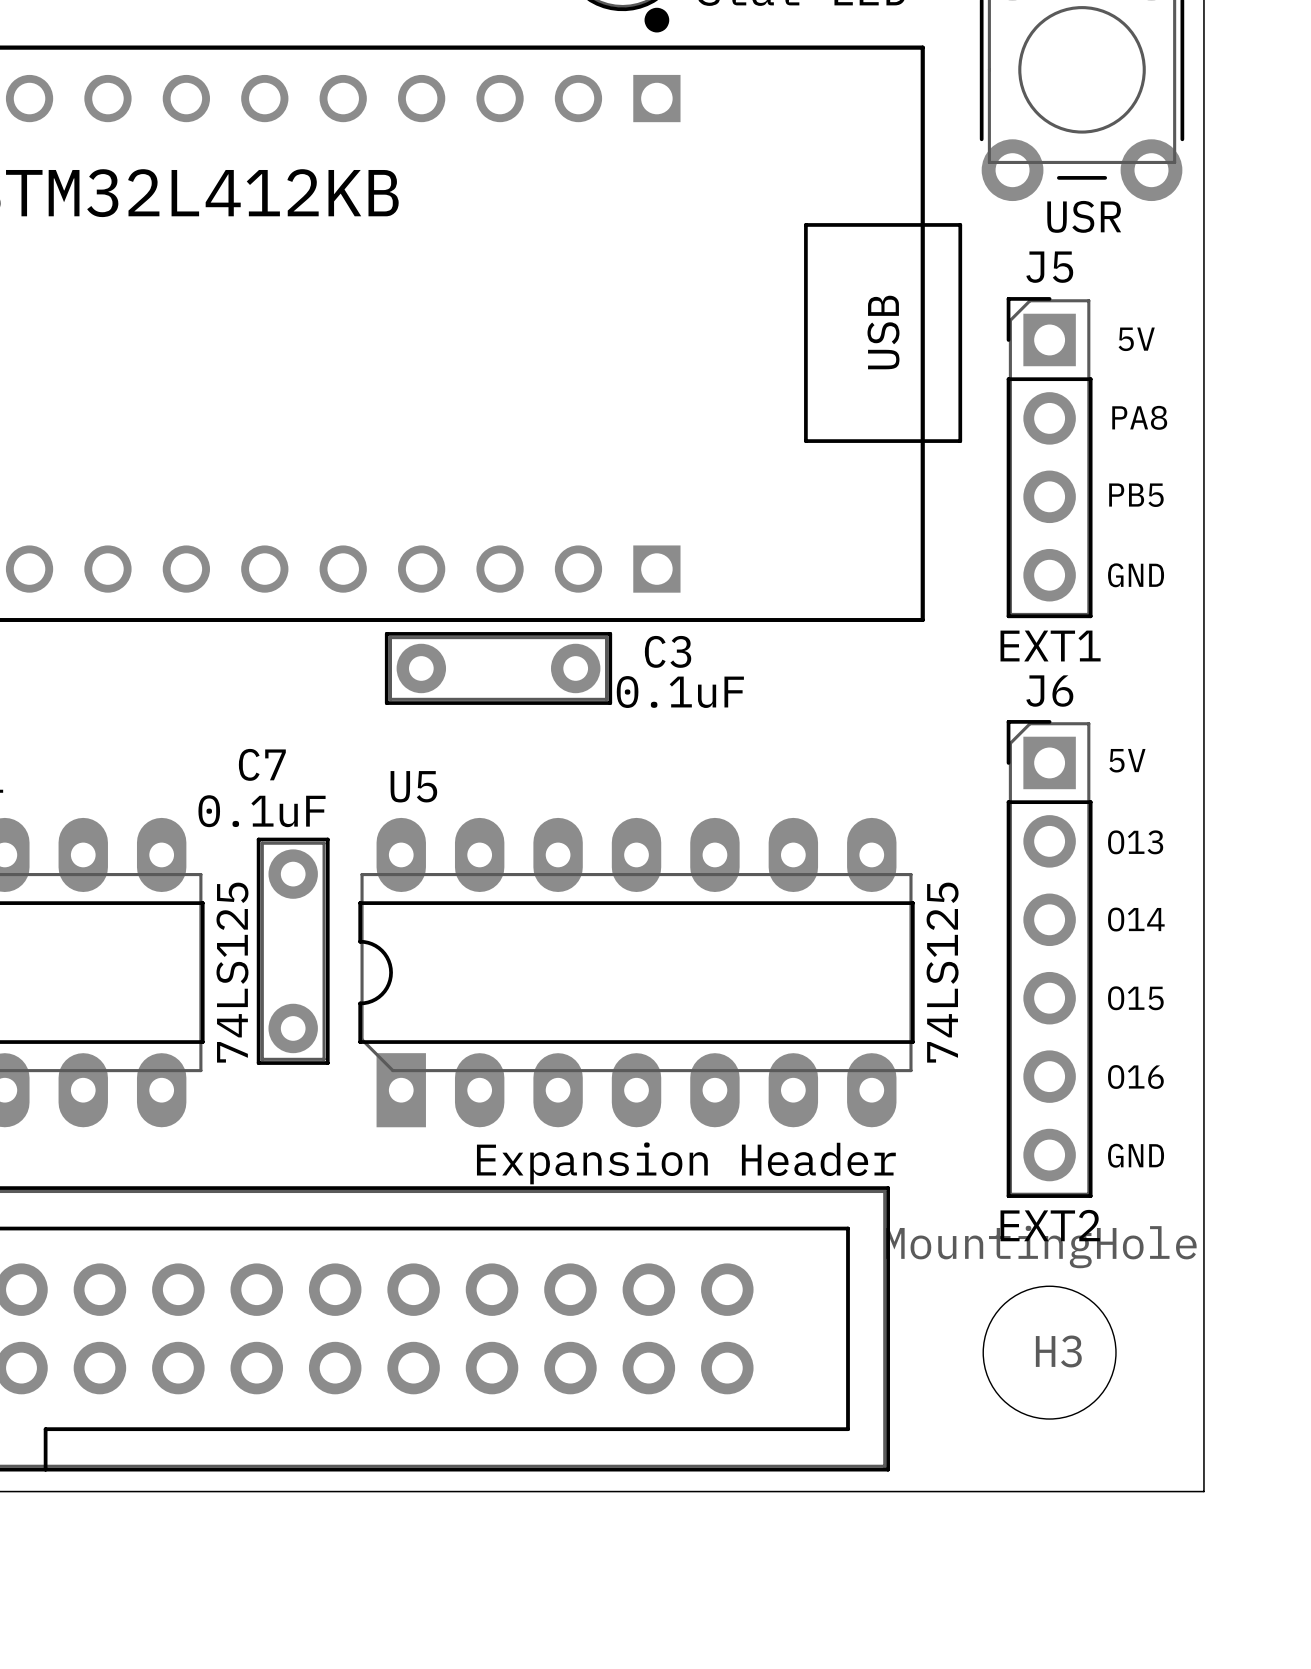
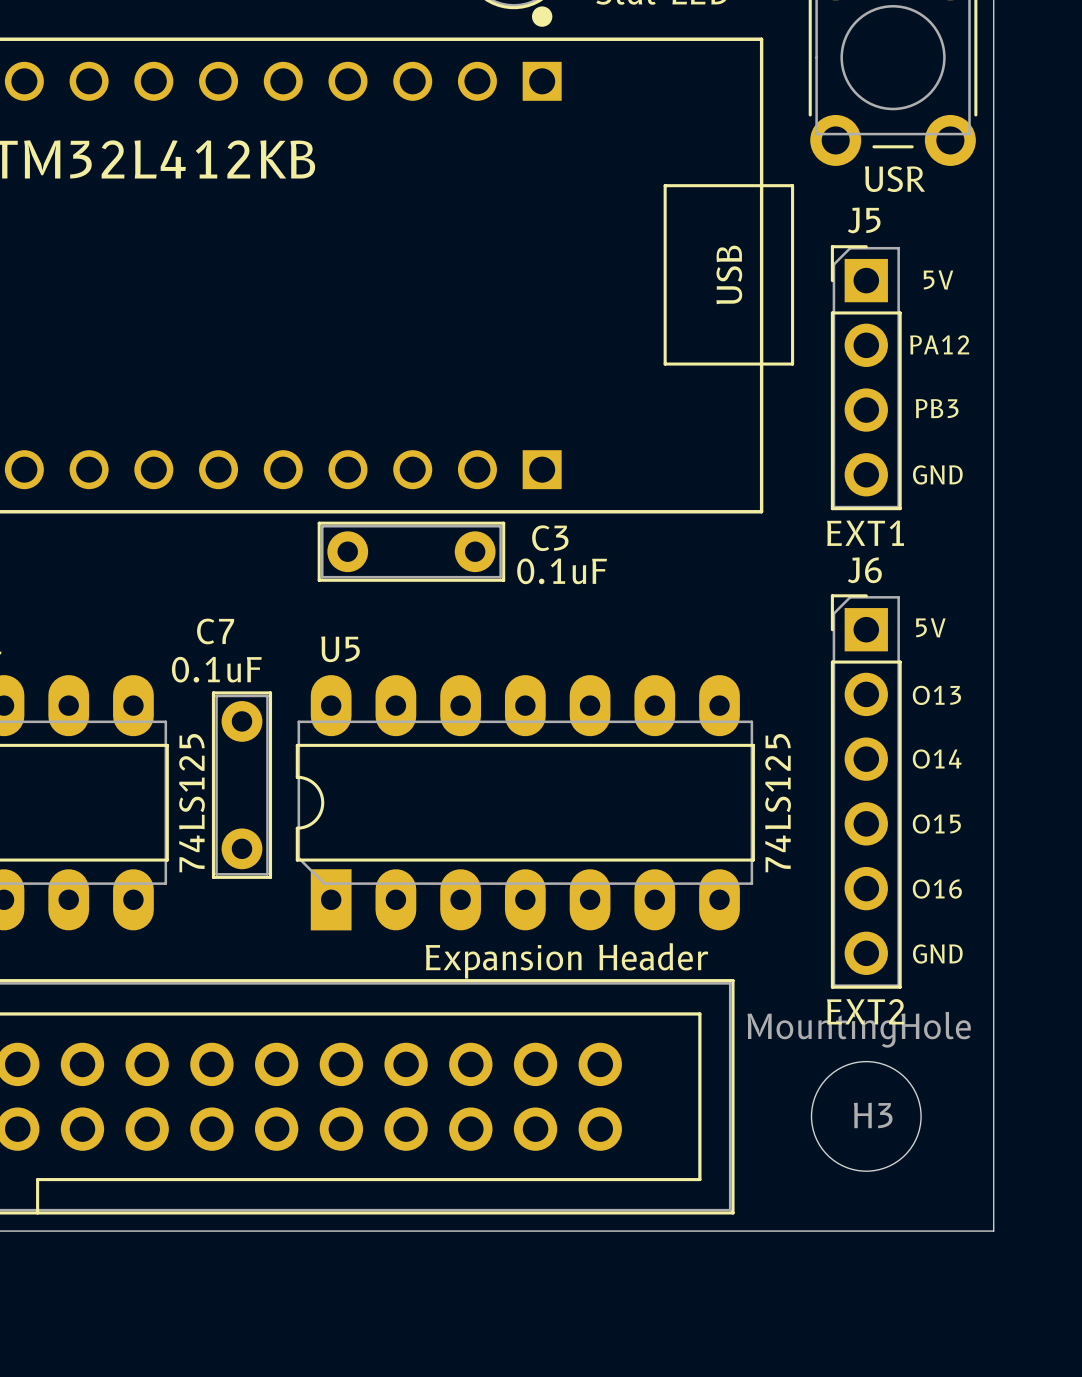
text: PA8 (1139, 417) -> PA12 (939, 344)
text: PB5 (1136, 495) -> PB3 (937, 408)

